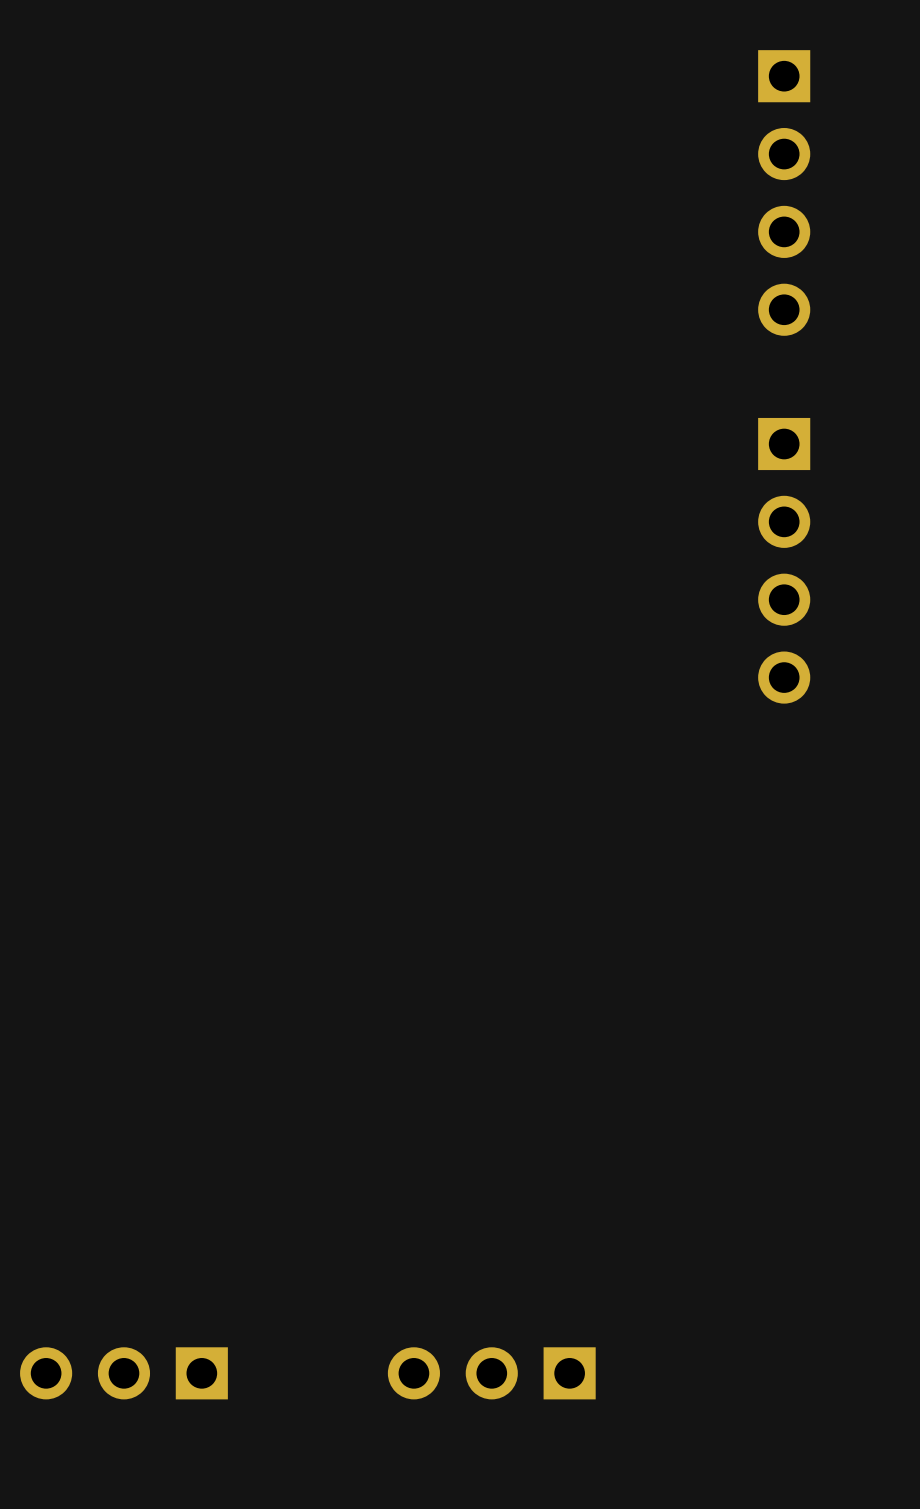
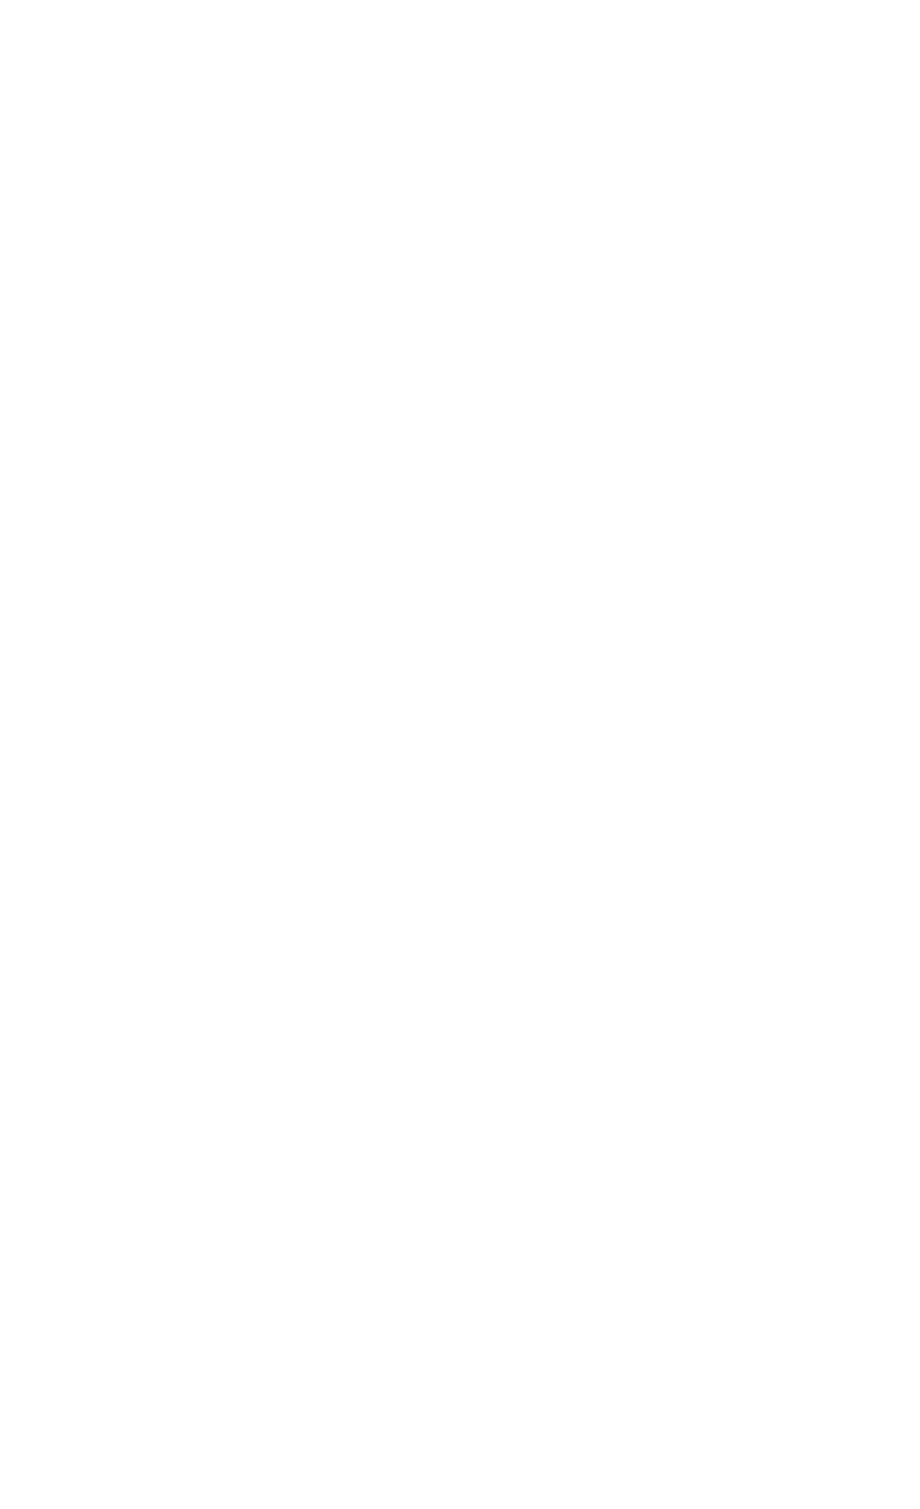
part: (784, 192) -> none
part: (784, 560) -> none
part: (123, 1373) -> none
part: (491, 1373) -> none

